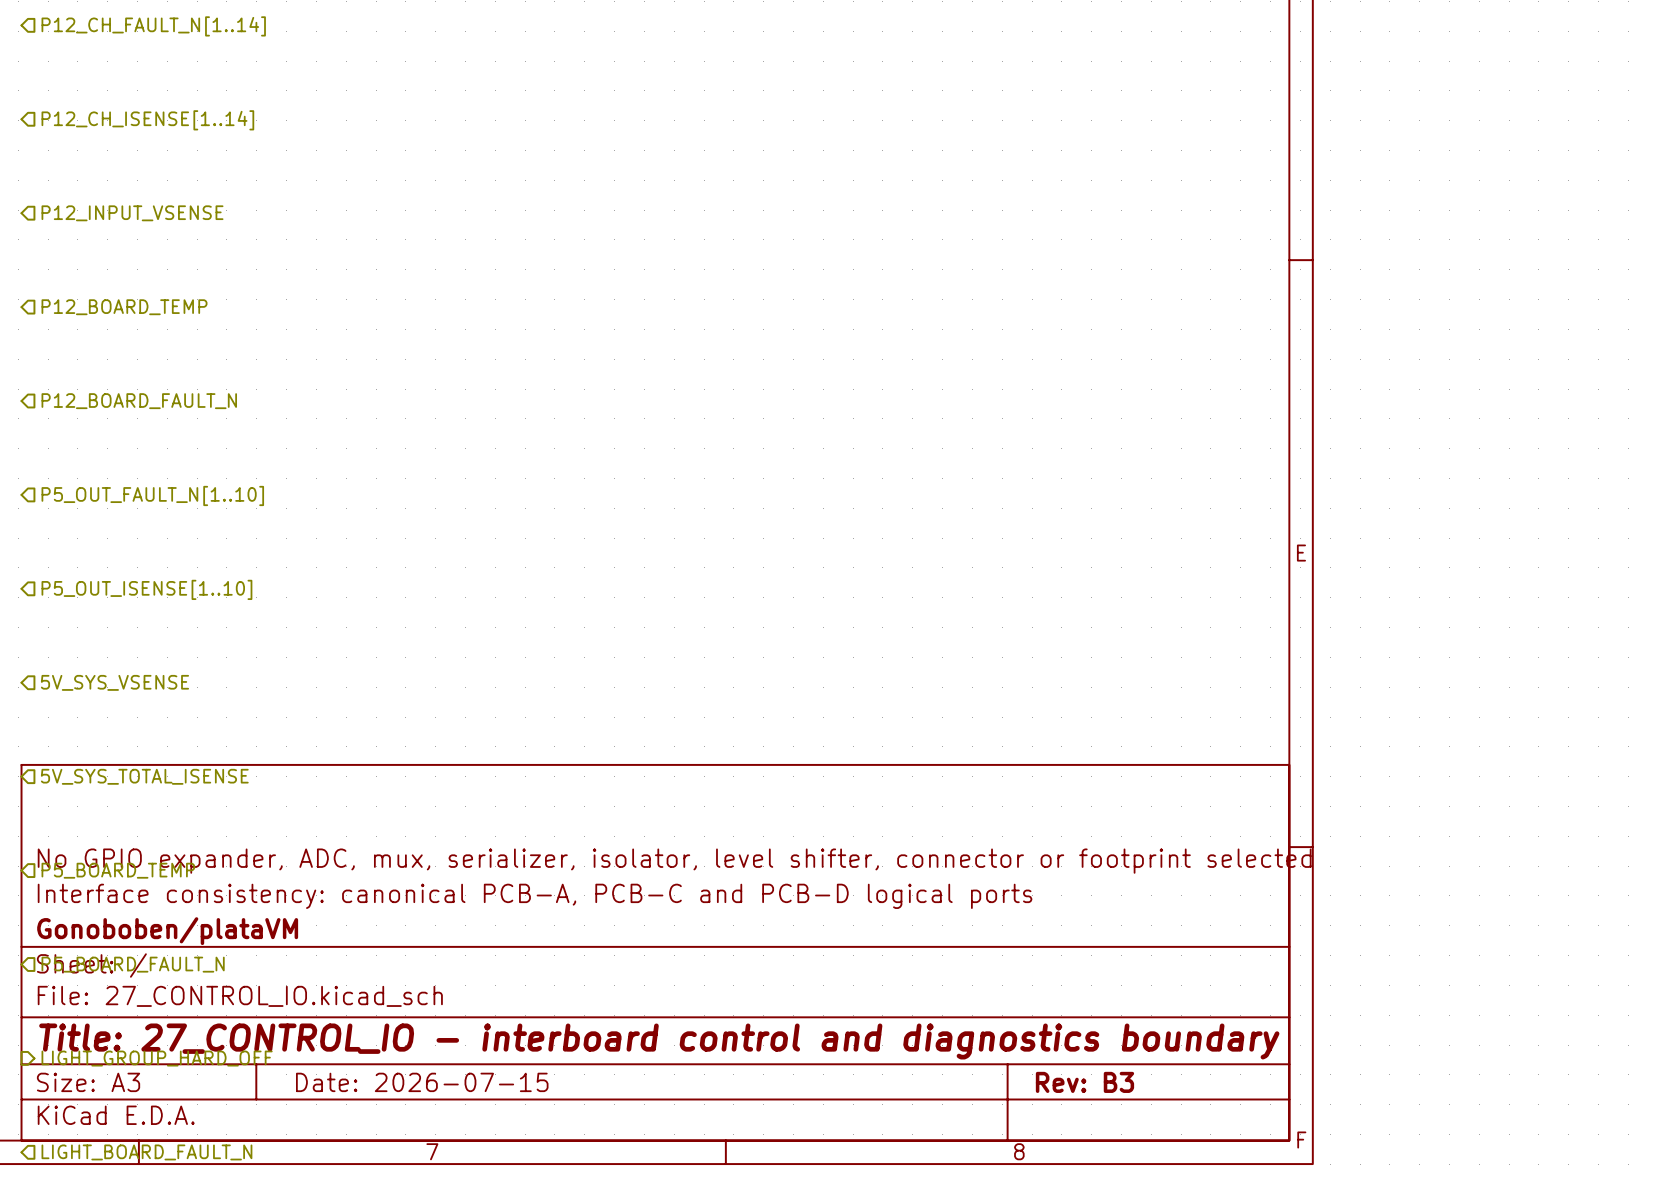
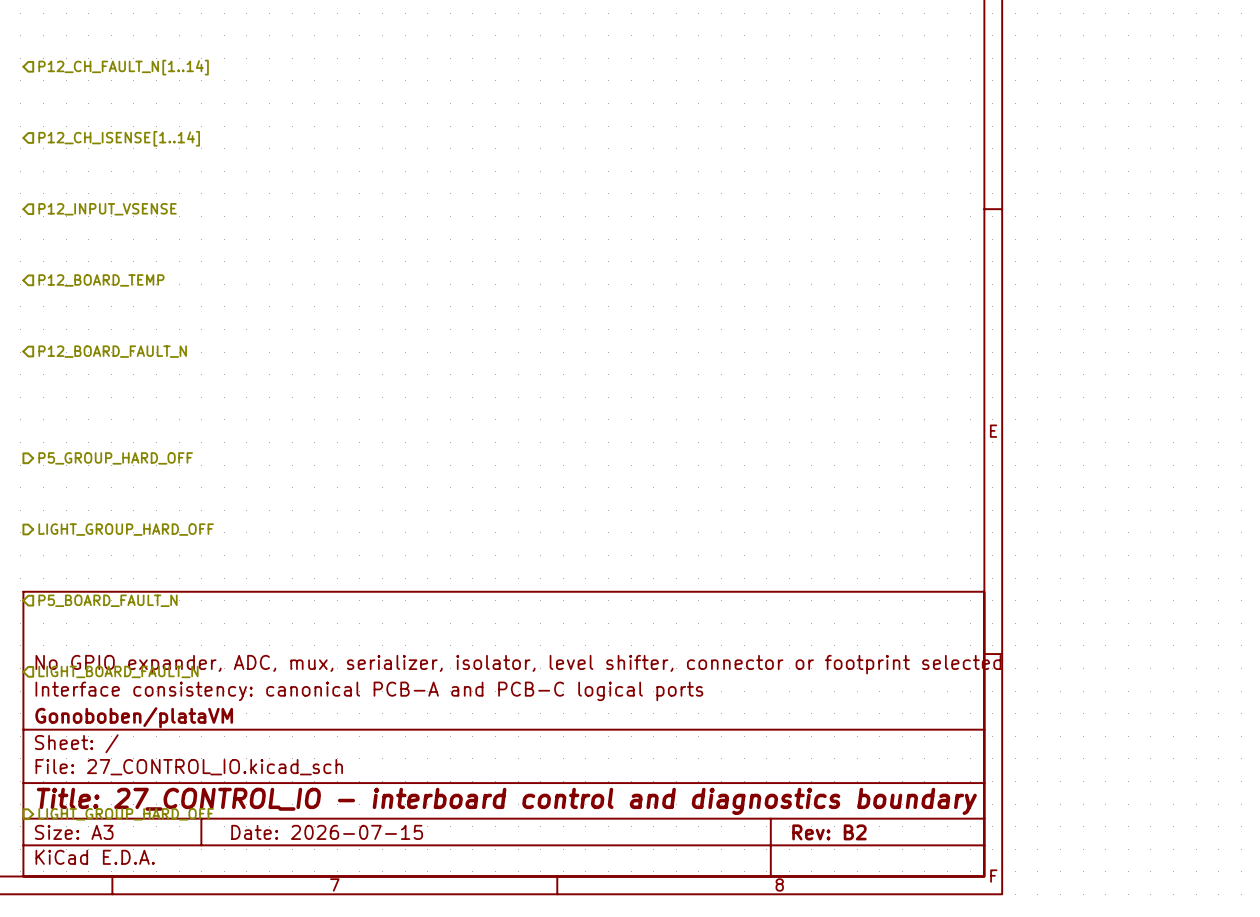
hierarchical label position: P12_CH_FAULT_N[1..14] (153, 26) -> P12_CH_FAULT_N[1..14] (123, 67)
hierarchical label position: P12_CH_ISENSE[1..14] (147, 120) -> P12_CH_ISENSE[1..14] (119, 138)
hierarchical label position: P12_INPUT_VSENSE (132, 213) -> P12_INPUT_VSENSE (107, 209)
hierarchical label position: P12_BOARD_TEMP (124, 307) -> P12_BOARD_TEMP (101, 280)
hierarchical label position: P12_BOARD_FAULT_N (139, 401) -> P12_BOARD_FAULT_N (112, 351)
hierarchical label: P5_OUT_FAULT_N[1..10] (152, 495) -> none
hierarchical label shape: input (146, 589) -> output (115, 458)
hierarchical label: P5_OUT_ISENSE[1..10] (146, 589) -> P5_GROUP_HARD_OFF (115, 458)
hierarchical label shape: input (114, 682) -> output (126, 529)
hierarchical label: 5V_SYS_VSENSE (114, 682) -> LIGHT_GROUP_HARD_OFF (126, 529)
hierarchical label: 5V_SYS_TOTAL_ISENSE (144, 776) -> P5_BOARD_FAULT_N (107, 600)
hierarchical label: P5_BOARD_TEMP (118, 870) -> LIGHT_BOARD_FAULT_N (118, 671)
title block: Interface consistency: canonical PCB-A, PCB-C and PCB-D logical ports (535, 896) -> Interface consistency: canonical PCB-A and PCB-C logical ports (369, 691)
hierarchical label: P5_BOARD_FAULT_N (133, 964) -> none
title block: Rev: B3 (1084, 1082) -> Rev: B2 (829, 832)
hierarchical label: LIGHT_BOARD_FAULT_N (146, 1152) -> none

